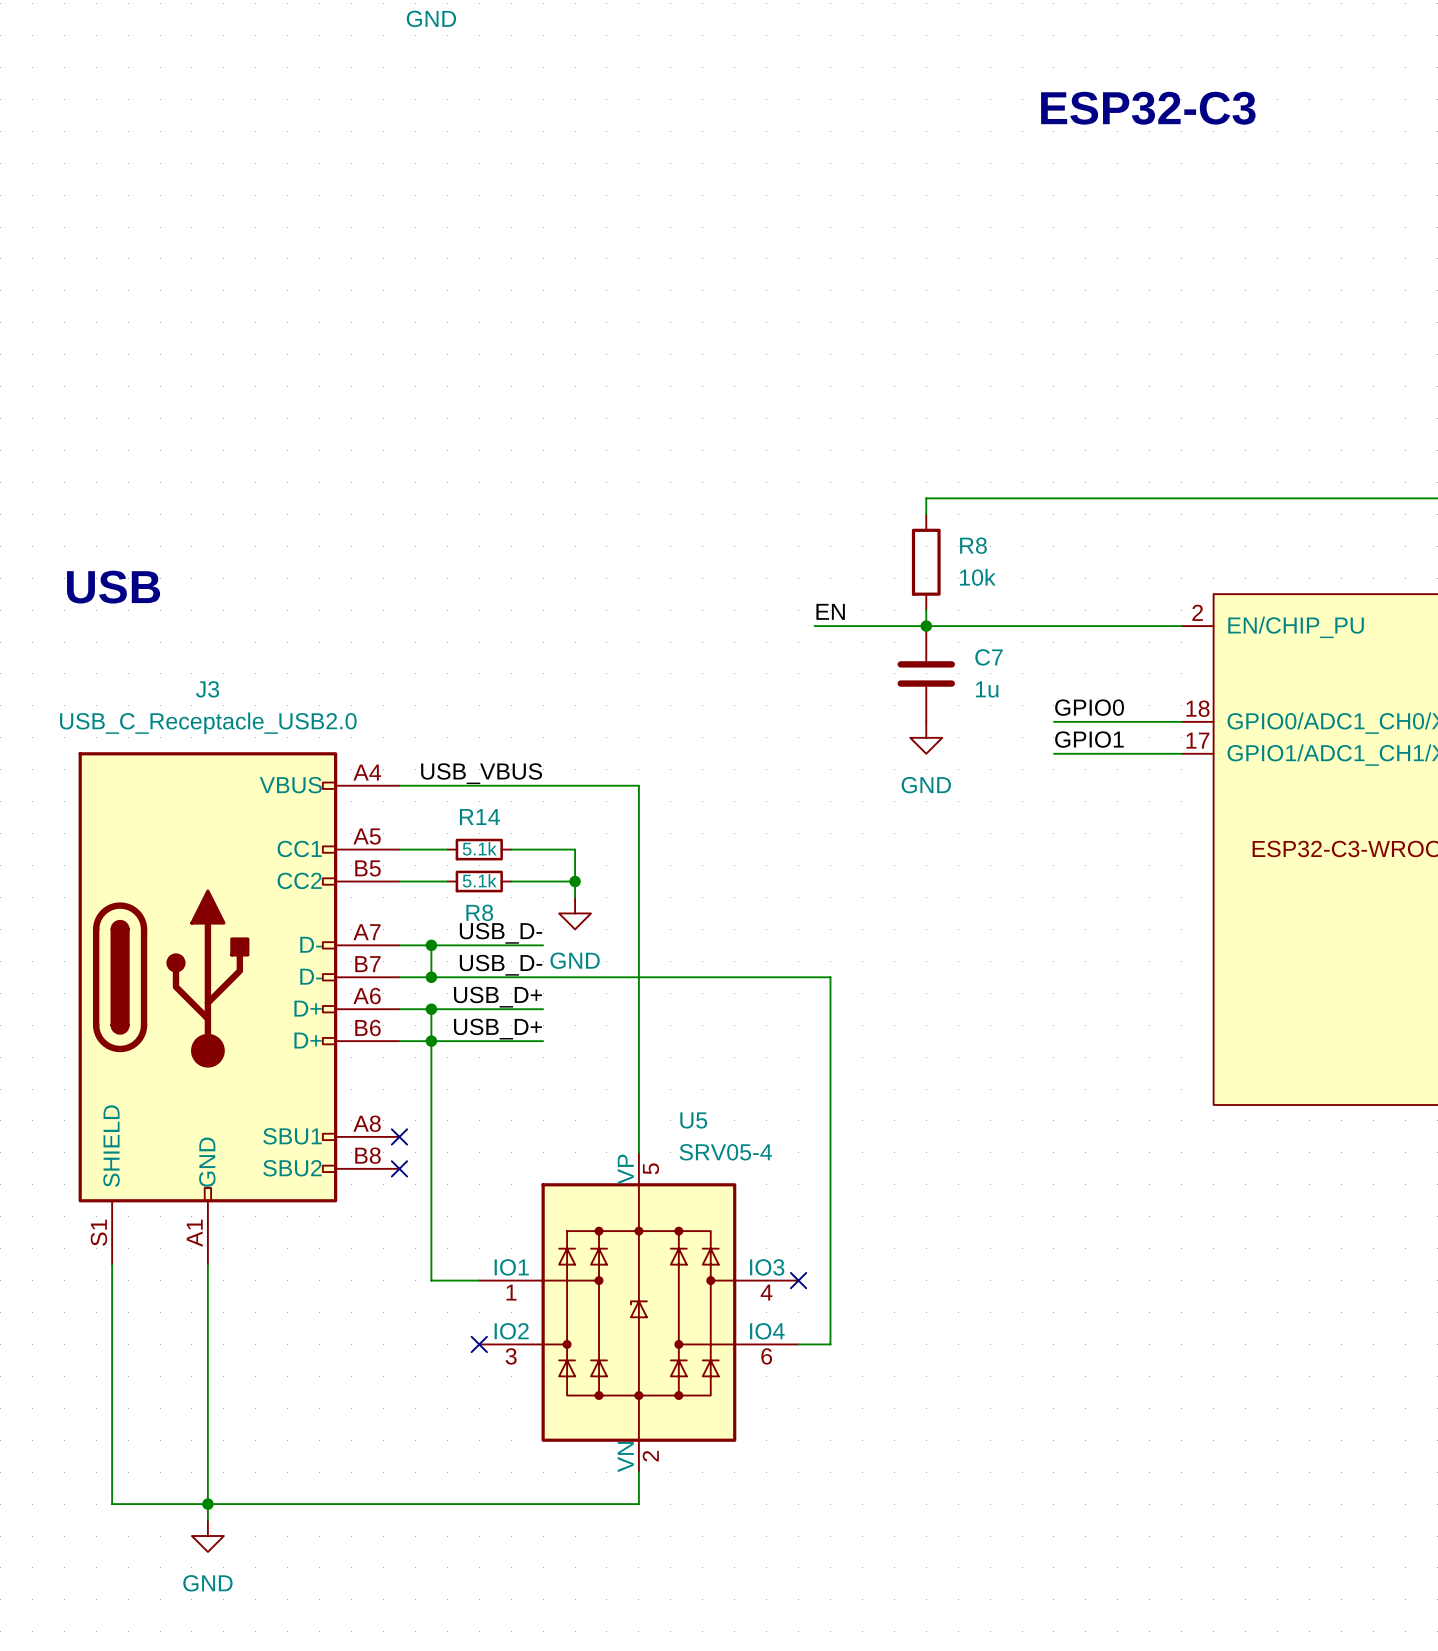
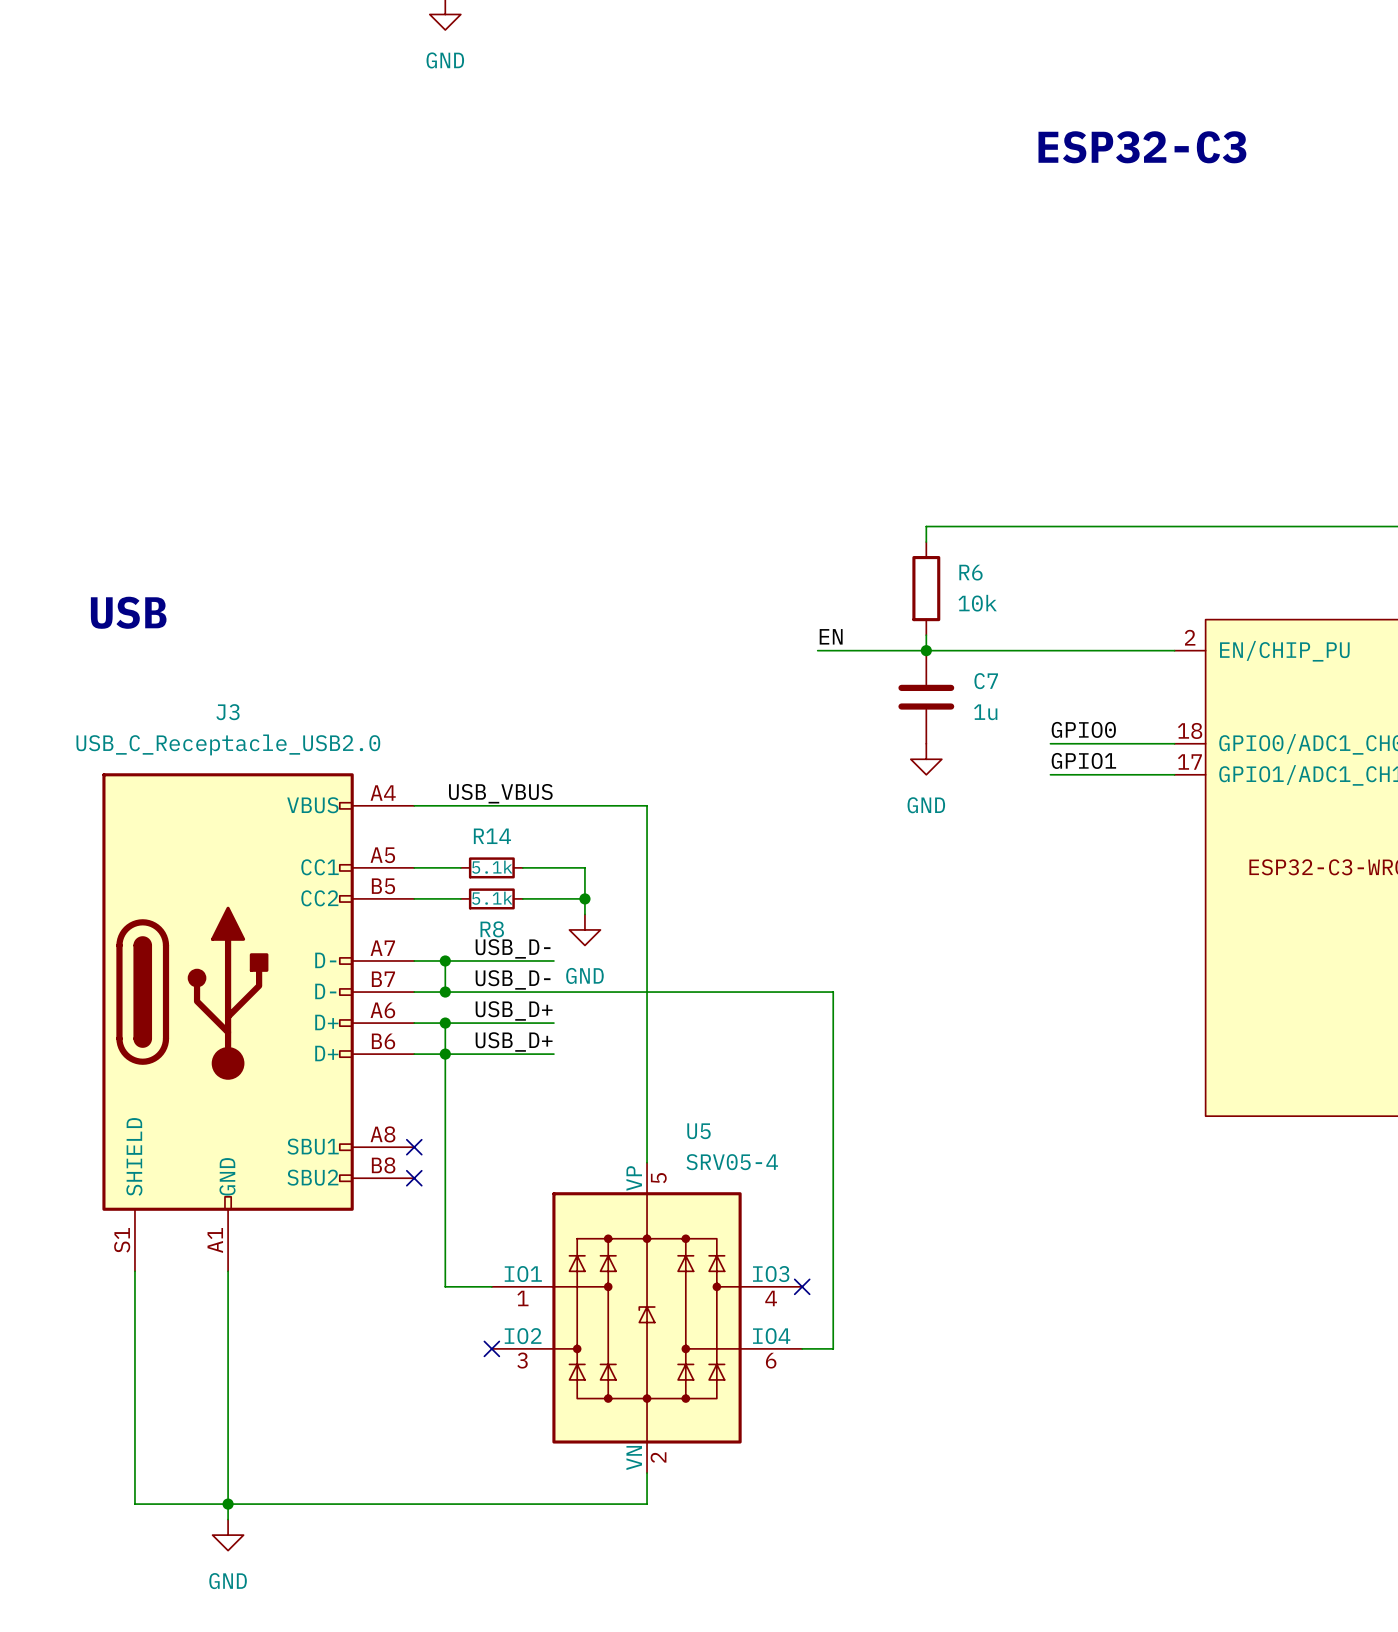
R8 name: R8 (973, 545) -> R6 (970, 572)

